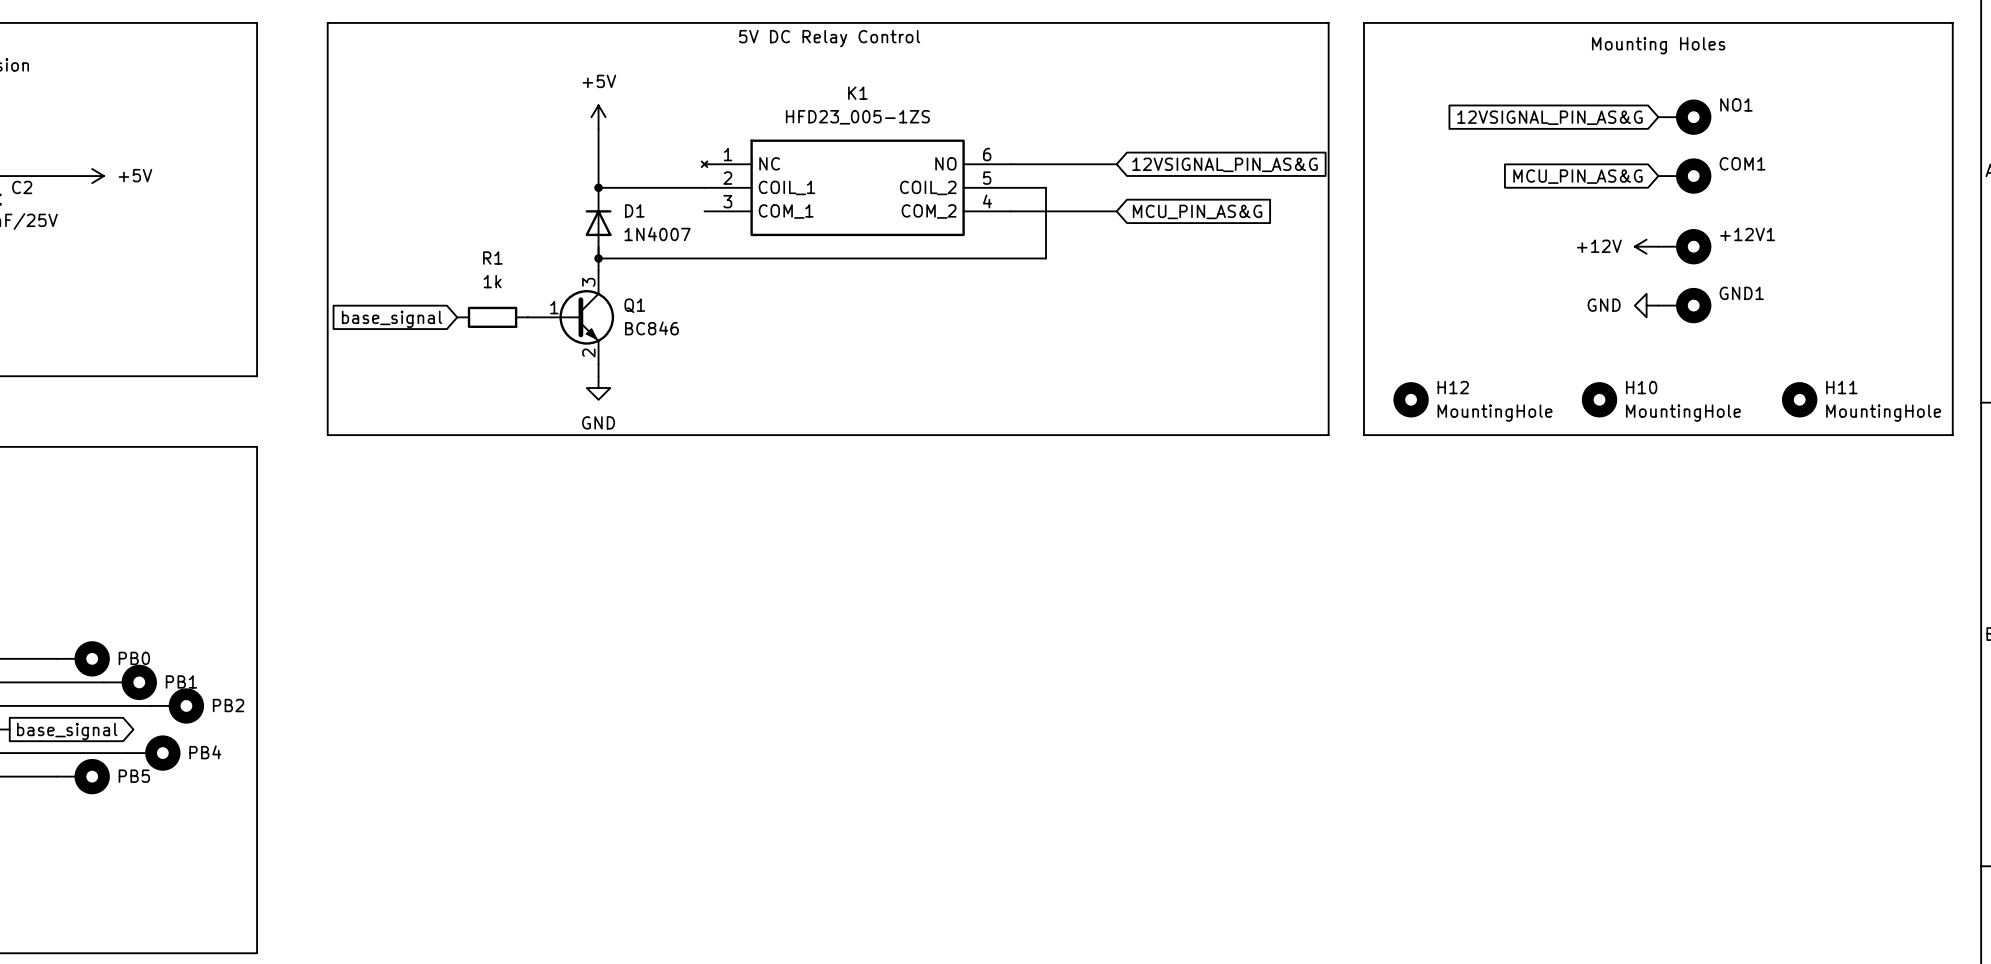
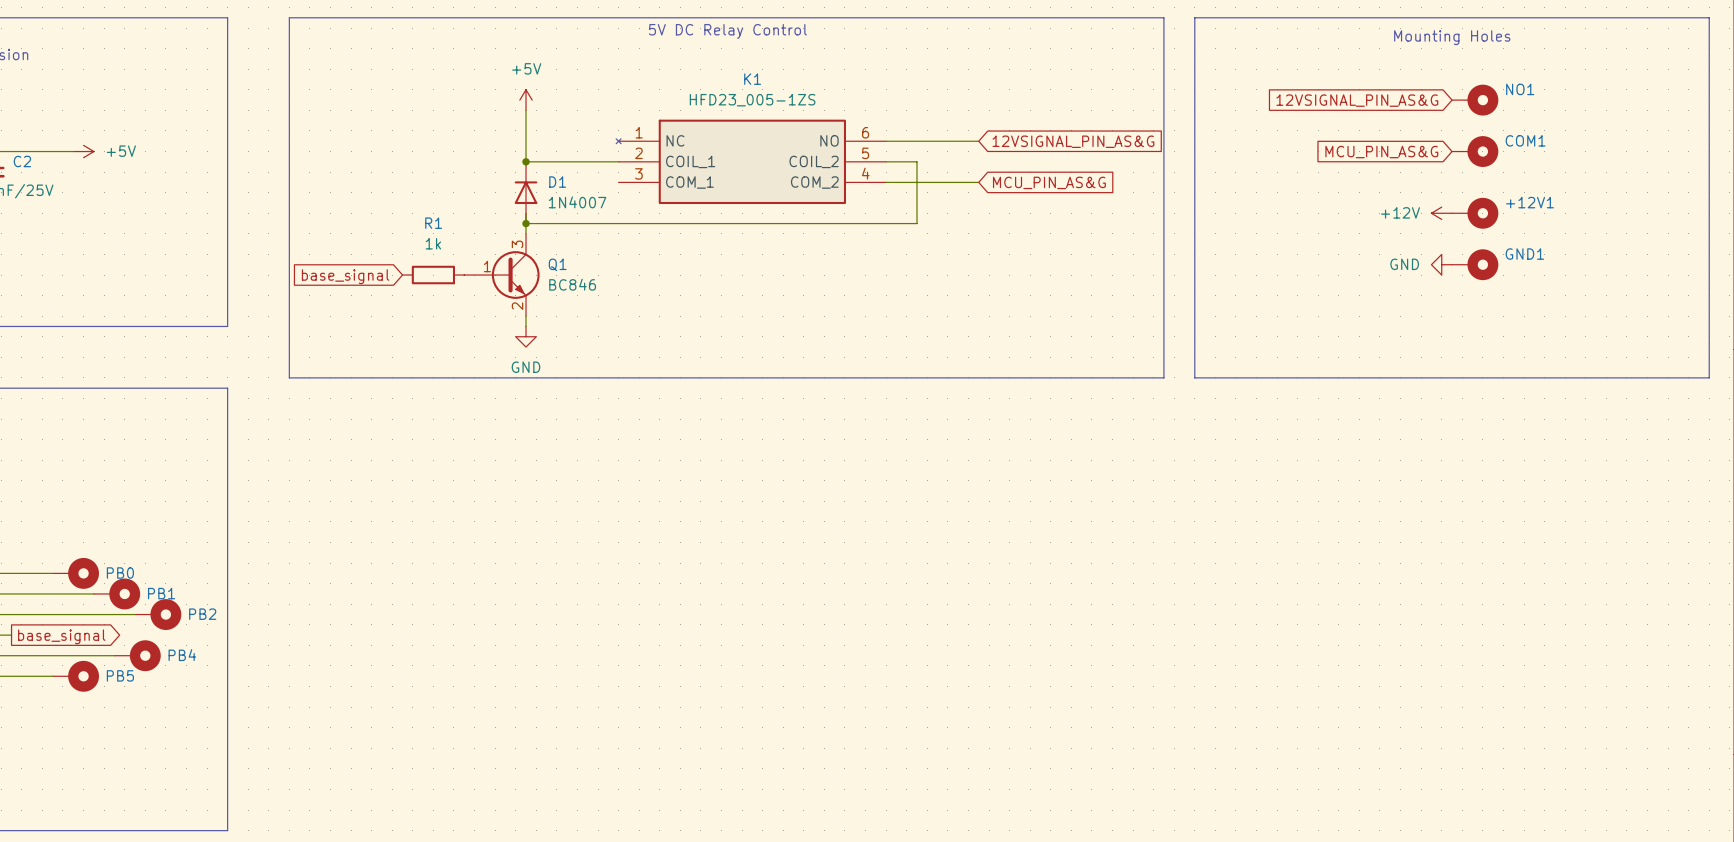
H12: MountingHole (1411, 399) -> none
H10: MountingHole (1599, 399) -> none
H11: MountingHole (1799, 399) -> none

